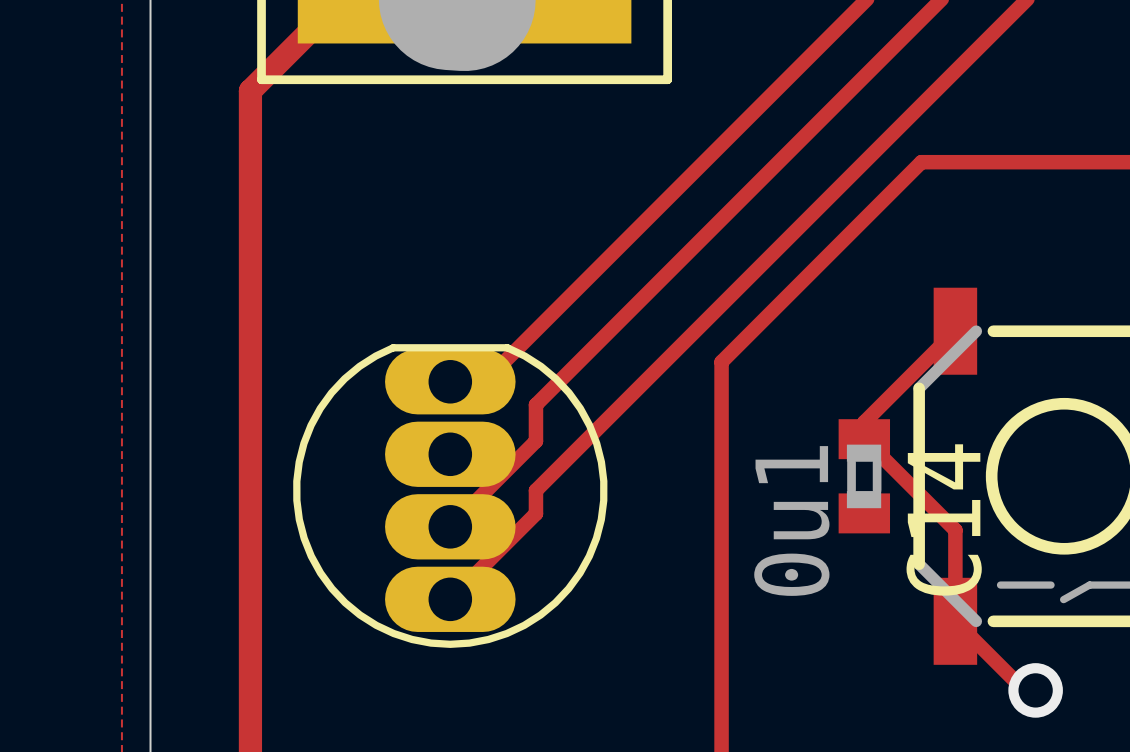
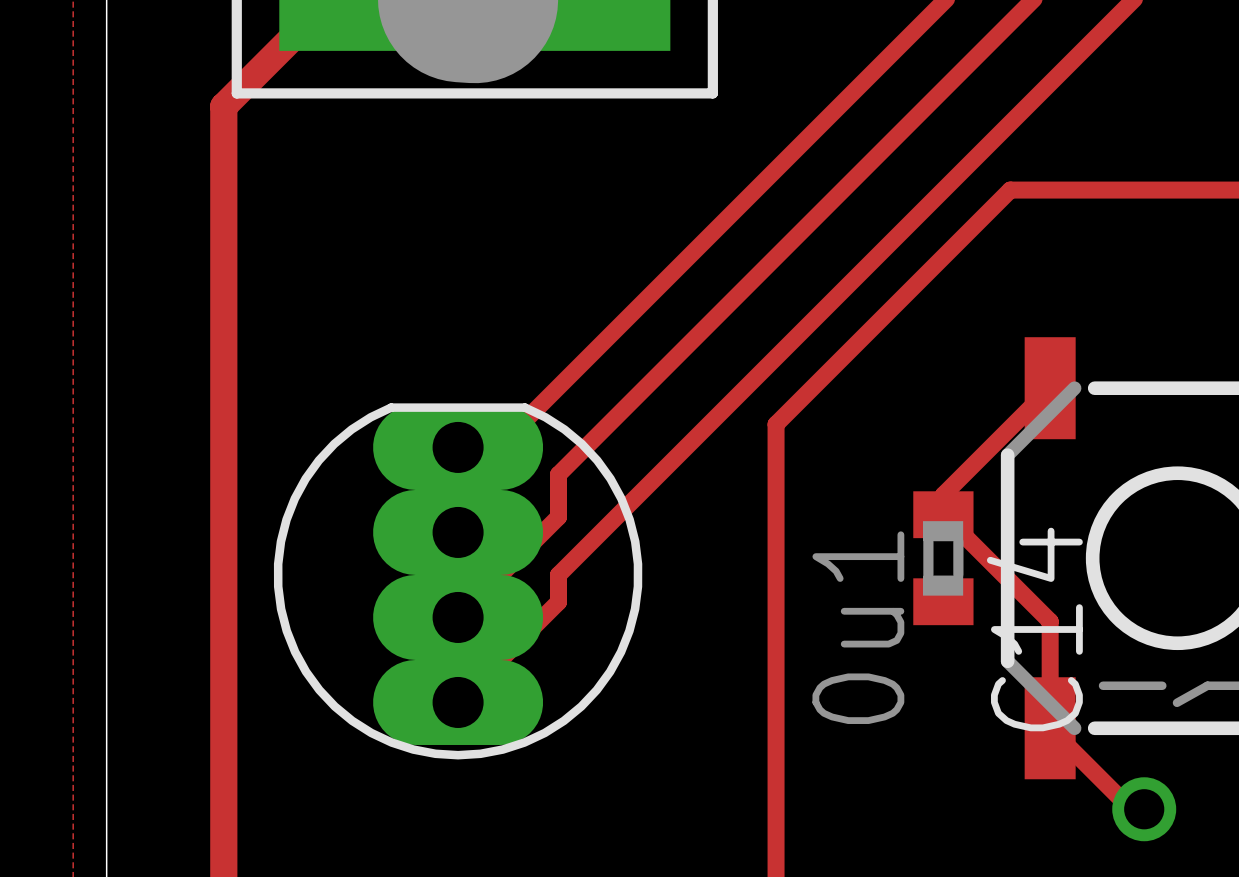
part footprint: [293, 344, 608, 648] -> [273, 403, 643, 760]

